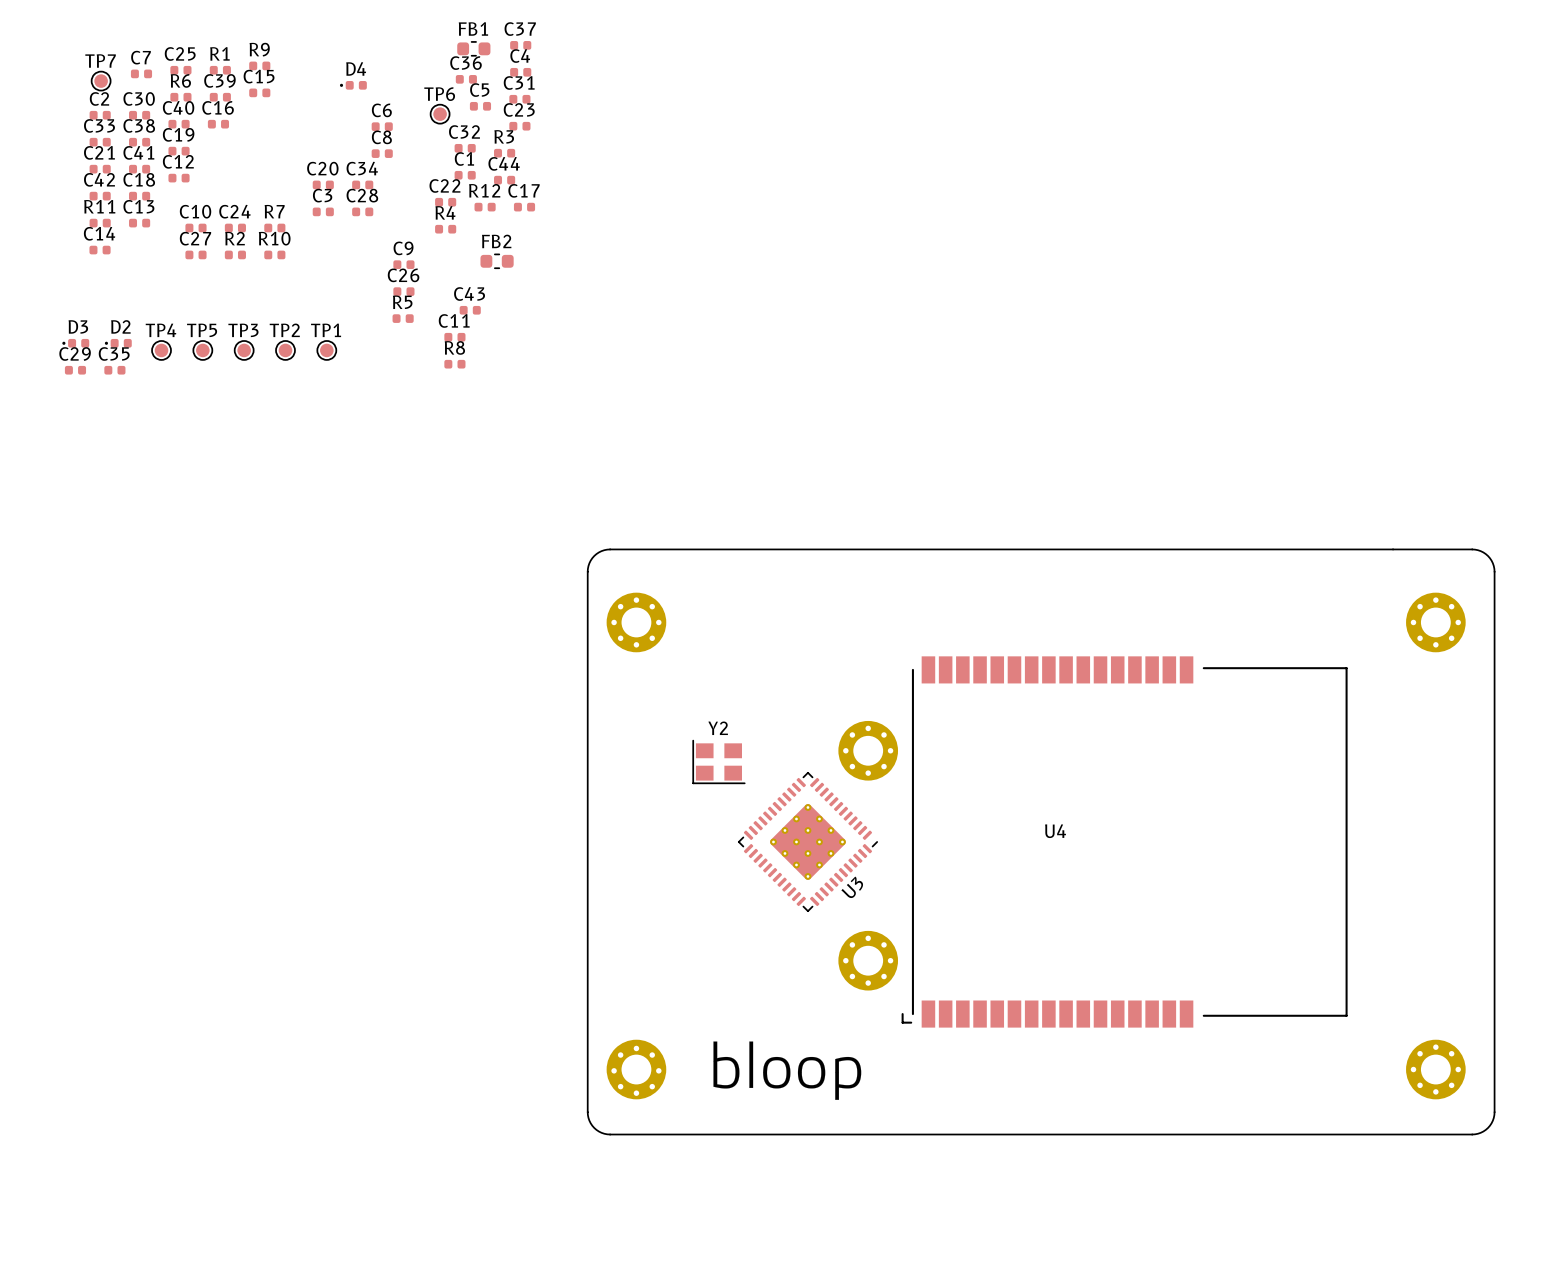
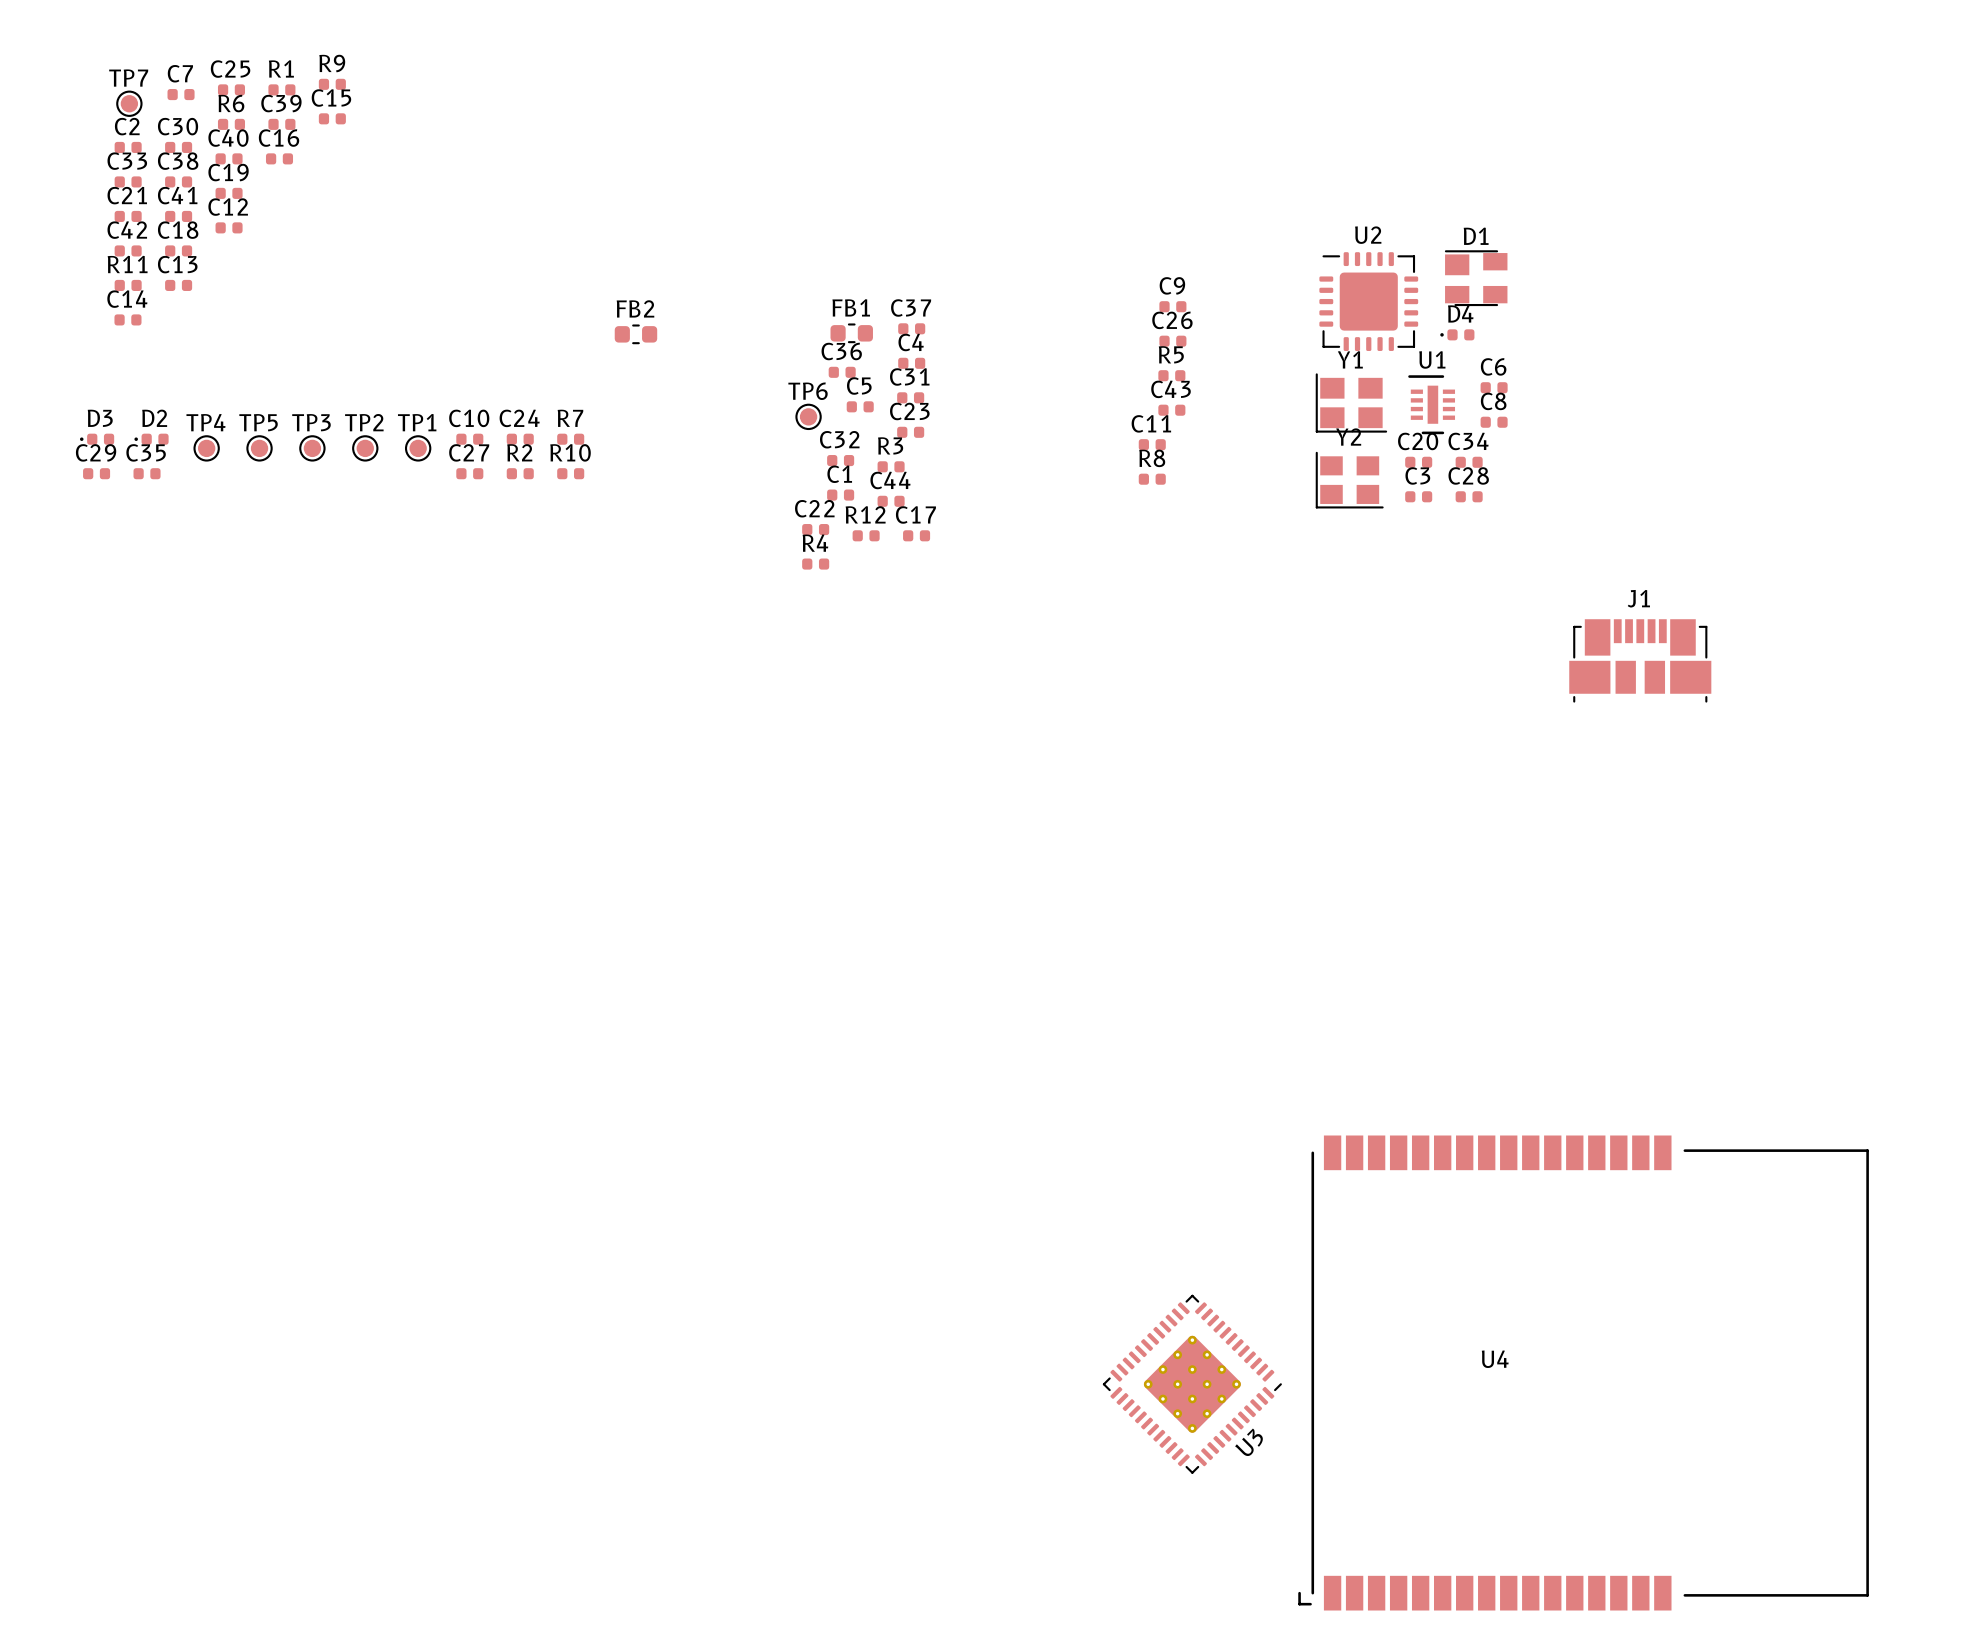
C37 position: (520, 45) -> (911, 328)
FB1 position: (473, 48) -> (851, 333)
C4 position: (520, 72) -> (911, 363)
C36 position: (466, 79) -> (842, 372)
D4 position: (353, 85) -> (1457, 334)
C31 position: (519, 99) -> (910, 397)
C5 position: (480, 106) -> (860, 406)
TP6 position: (440, 114) -> (808, 416)
C6 position: (382, 126) -> (1494, 387)
C23 position: (519, 126) -> (910, 432)
C32 position: (465, 148) -> (840, 460)
C8 position: (382, 153) -> (1494, 422)
R3 position: (504, 153) -> (891, 466)
C1 position: (465, 175) -> (840, 495)
C44 position: (504, 180) -> (891, 501)
C20 position: (323, 184) -> (1418, 462)
C34 position: (362, 184) -> (1469, 462)
C22 position: (445, 202) -> (815, 529)
R12 position: (485, 207) -> (866, 535)
C17 position: (524, 207) -> (916, 535)
C3 position: (323, 211) -> (1418, 496)
C28 position: (362, 211) -> (1469, 496)
D1: none -> (1476, 278)
C10 position: (195, 227) -> (469, 439)
C24 position: (235, 227) -> (520, 439)
R7 position: (274, 227) -> (570, 439)
R4 position: (445, 229) -> (815, 564)
U2: none -> (1368, 301)
C27 position: (195, 254) -> (469, 473)
R2 position: (235, 254) -> (520, 473)
R10 position: (274, 254) -> (570, 473)
C9 position: (403, 264) -> (1172, 306)
C26 position: (403, 291) -> (1172, 341)
C43 position: (470, 310) -> (1171, 410)
Y1: none -> (1351, 402)
U1: none -> (1431, 404)
R5 position: (403, 318) -> (1171, 375)
C11 position: (454, 337) -> (1152, 444)
R8 position: (454, 364) -> (1152, 479)
J1: none -> (1640, 660)
board edge: (610, 549) (1472, 549) (1483, 552) (1491, 560) (1494, 571) (1494, 1112) (1491, 1123) (1483, 1131) (1472, 1134) (610, 1134) (598, 1131) (590, 1123) (587, 1112) (587, 571) (589, 563) (594, 555) (601, 551) (610, 549) -> none
part: (636, 622) -> none
part: (1435, 622) -> none
part: (868, 750) -> none
Y2 position: (718, 761) -> (1349, 480)
U3 position: (807, 841) -> (1192, 1384)
U4 position: (1124, 841) -> (1583, 1373)
part: (868, 960) -> none
drawing: [713, 1041, 862, 1100] -> none
part: (636, 1069) -> none
part: (1435, 1069) -> none

